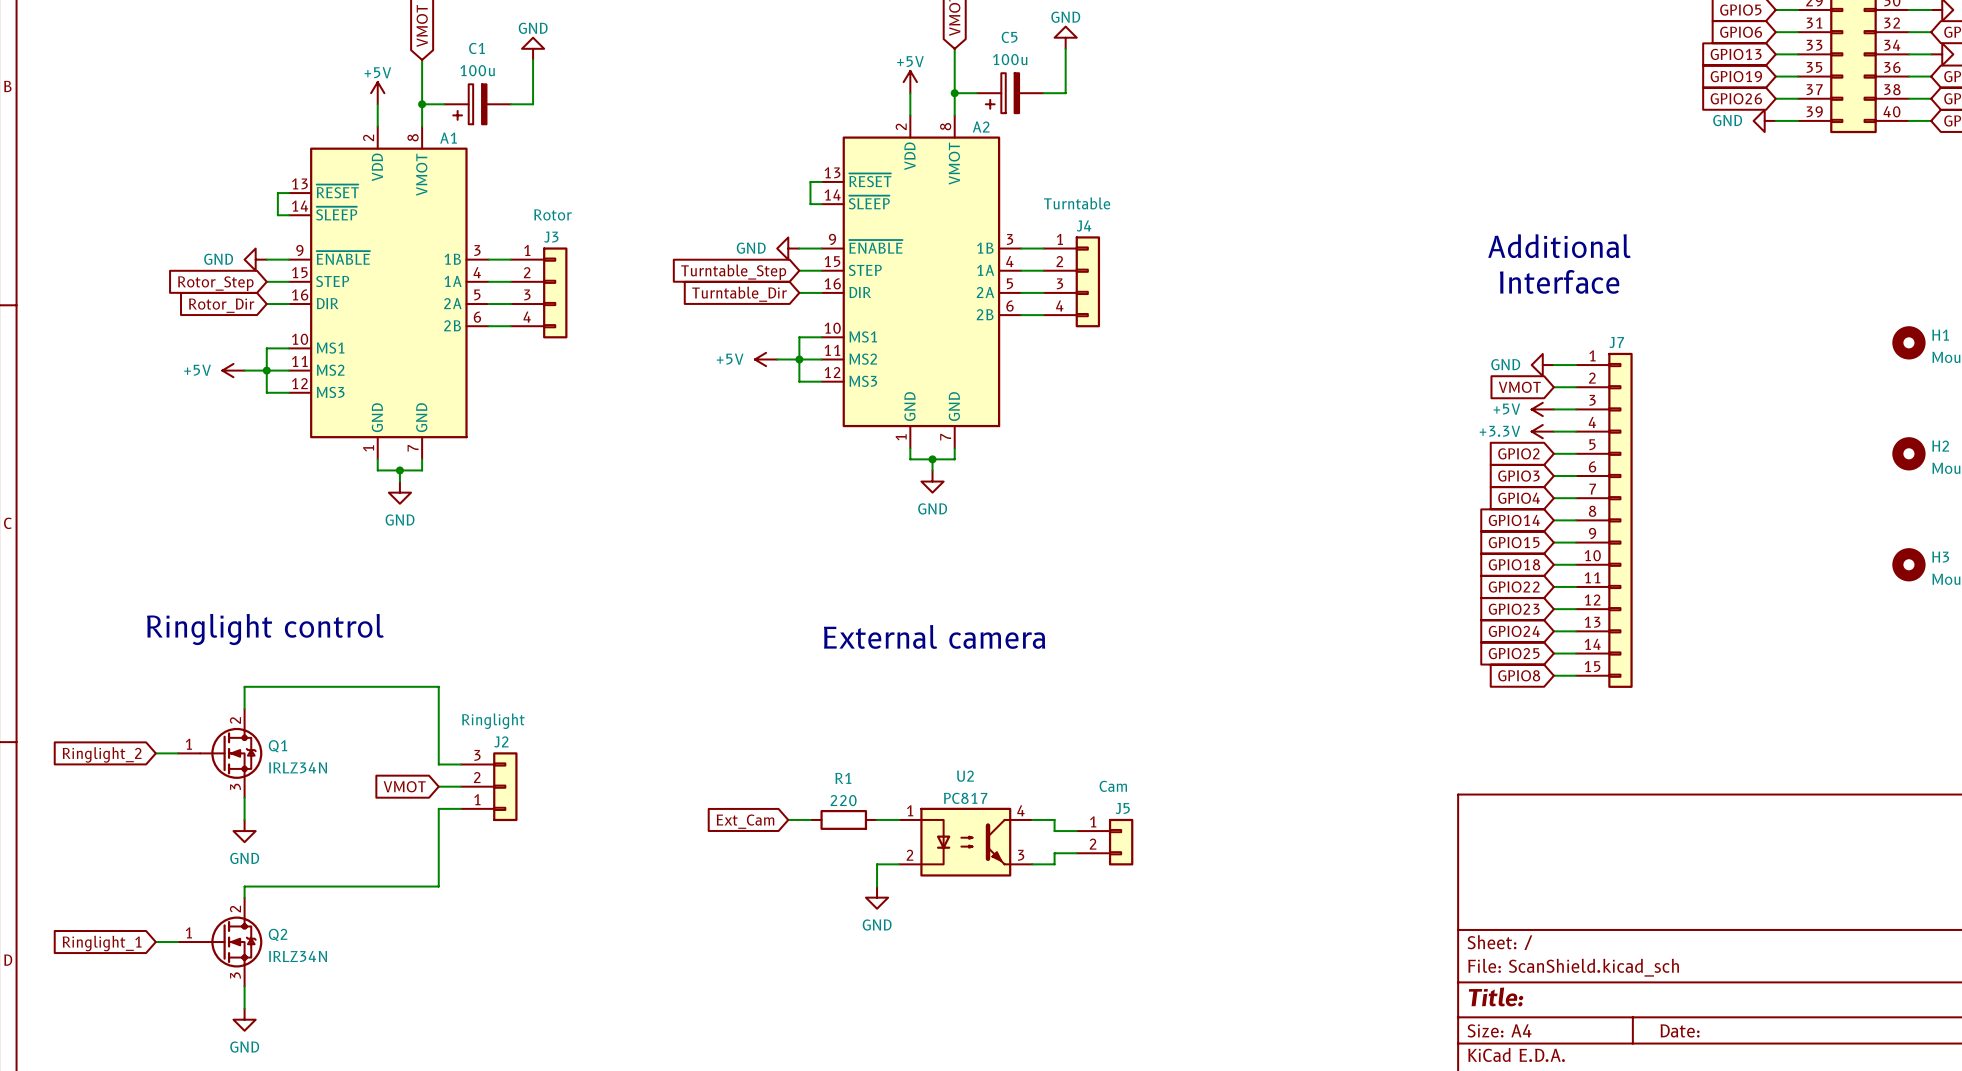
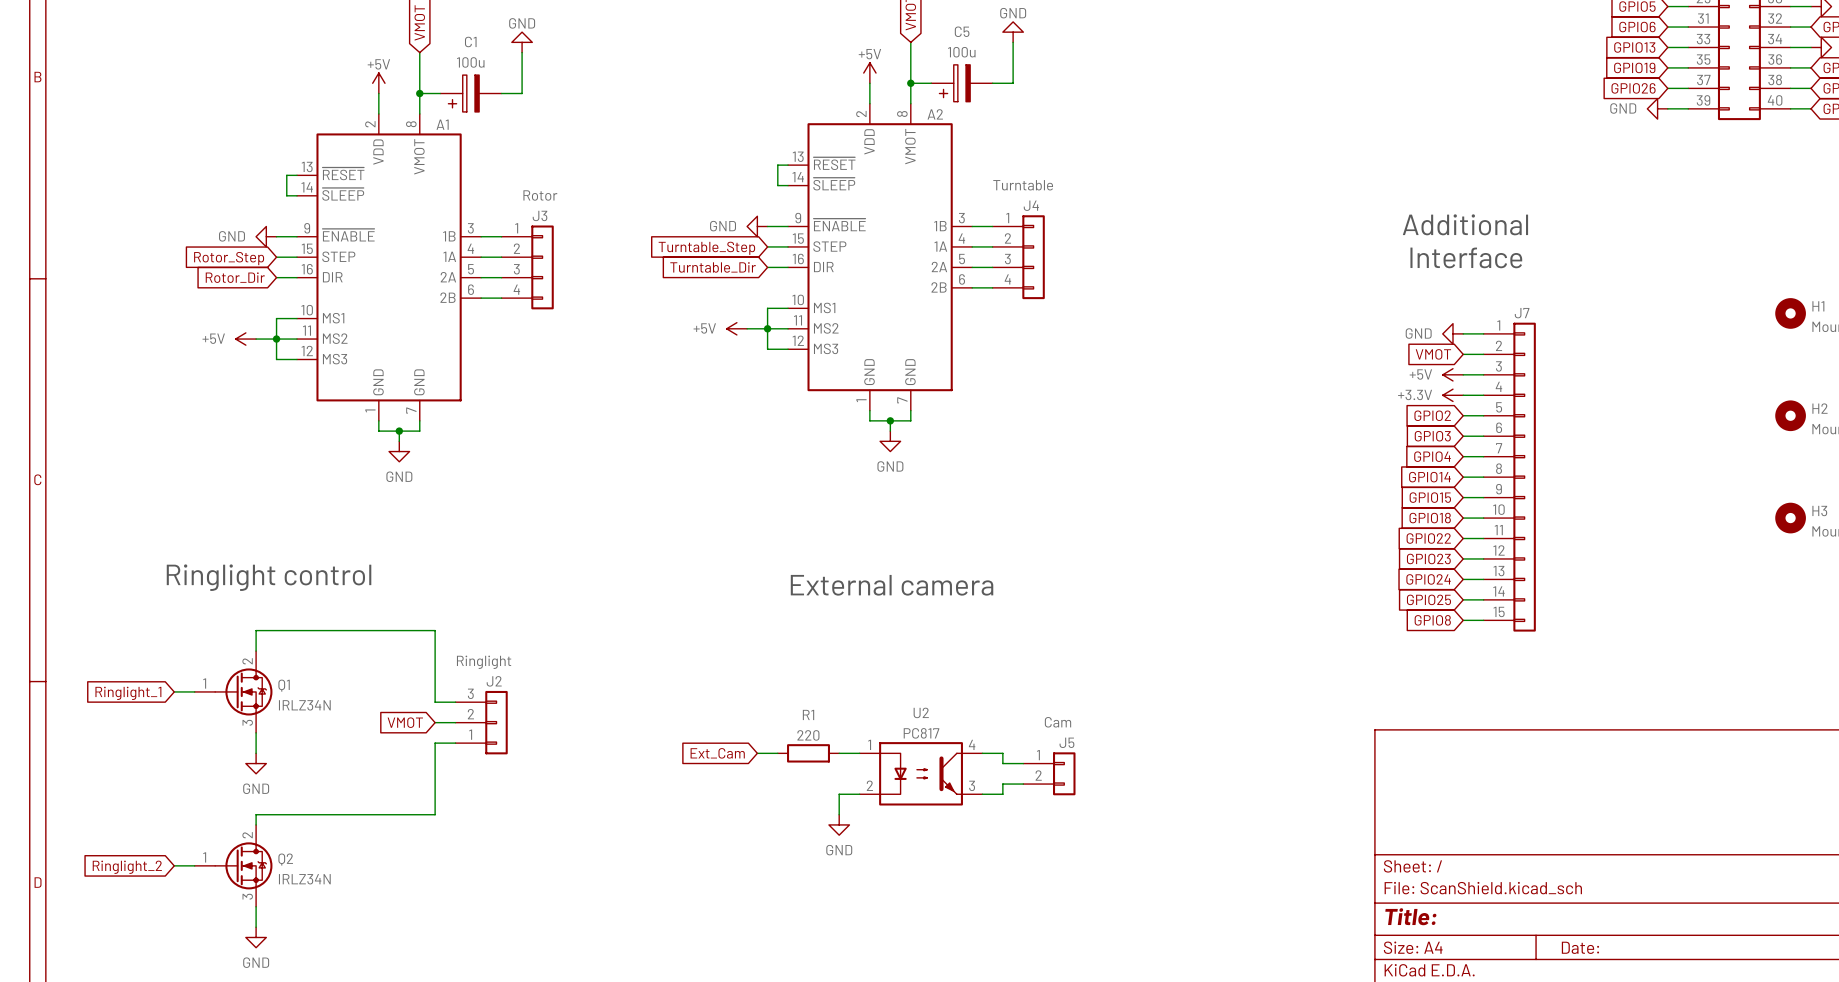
global label: Ringlight_2 (102, 754) -> Ringlight_1 (128, 693)
global label: Ringlight_1 (102, 943) -> Ringlight_2 (127, 867)

